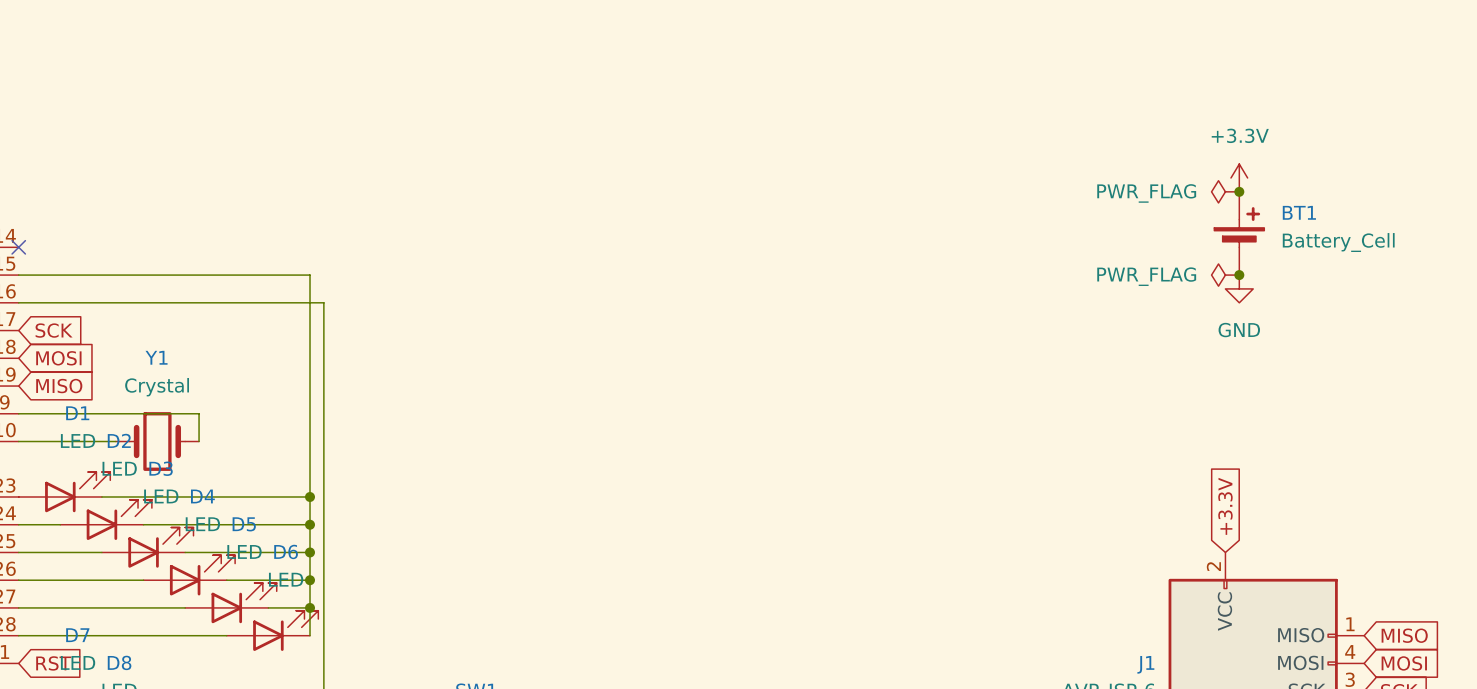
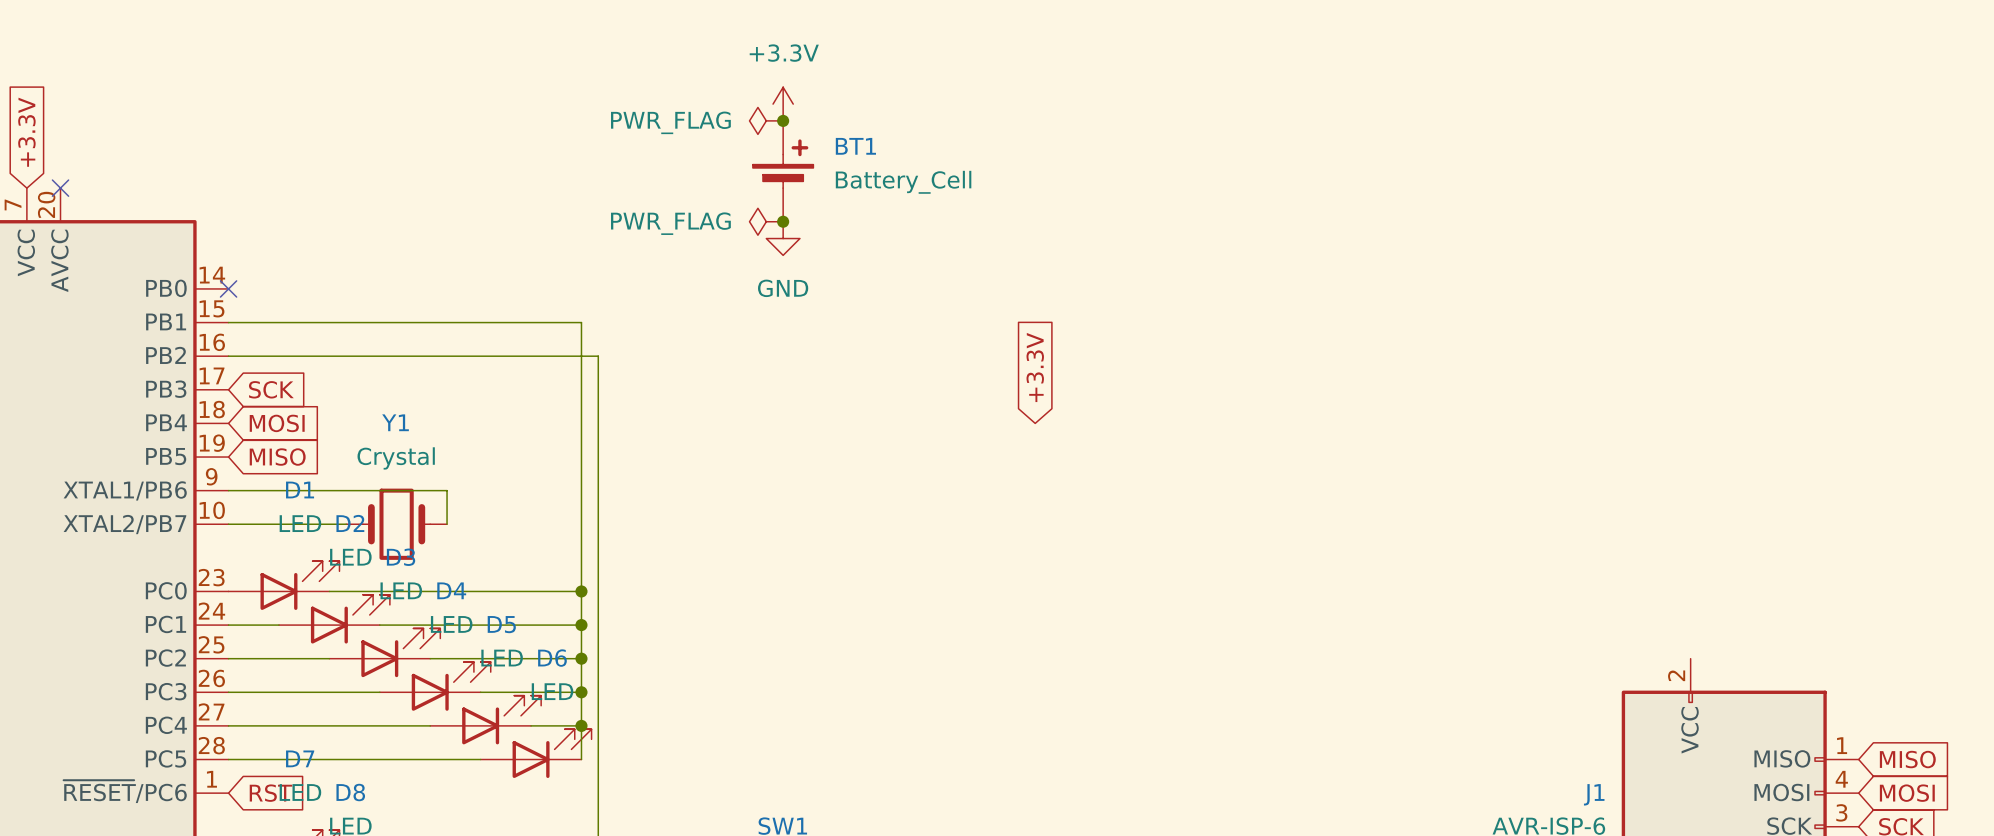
power symbol: none -> +3.3V (783, 104)
power symbol: none -> PWR_FLAG (766, 120)
junction: none -> (783, 120)
power symbol: +3.3V (1239, 177) -> none
power symbol: none -> PWR_FLAG (766, 221)
junction: none -> (783, 221)
power symbol: PWR_FLAG (1225, 191) -> none
junction: (1239, 191) -> none
power symbol: none -> GND (783, 238)
BT1 position: (1239, 233) -> (783, 171)
power symbol: PWR_FLAG (1225, 275) -> none
junction: (1239, 275) -> none
power symbol: GND (1239, 288) -> none
global label: none -> +3.3V (1035, 367)
global label: +3.3V (1225, 506) -> none

